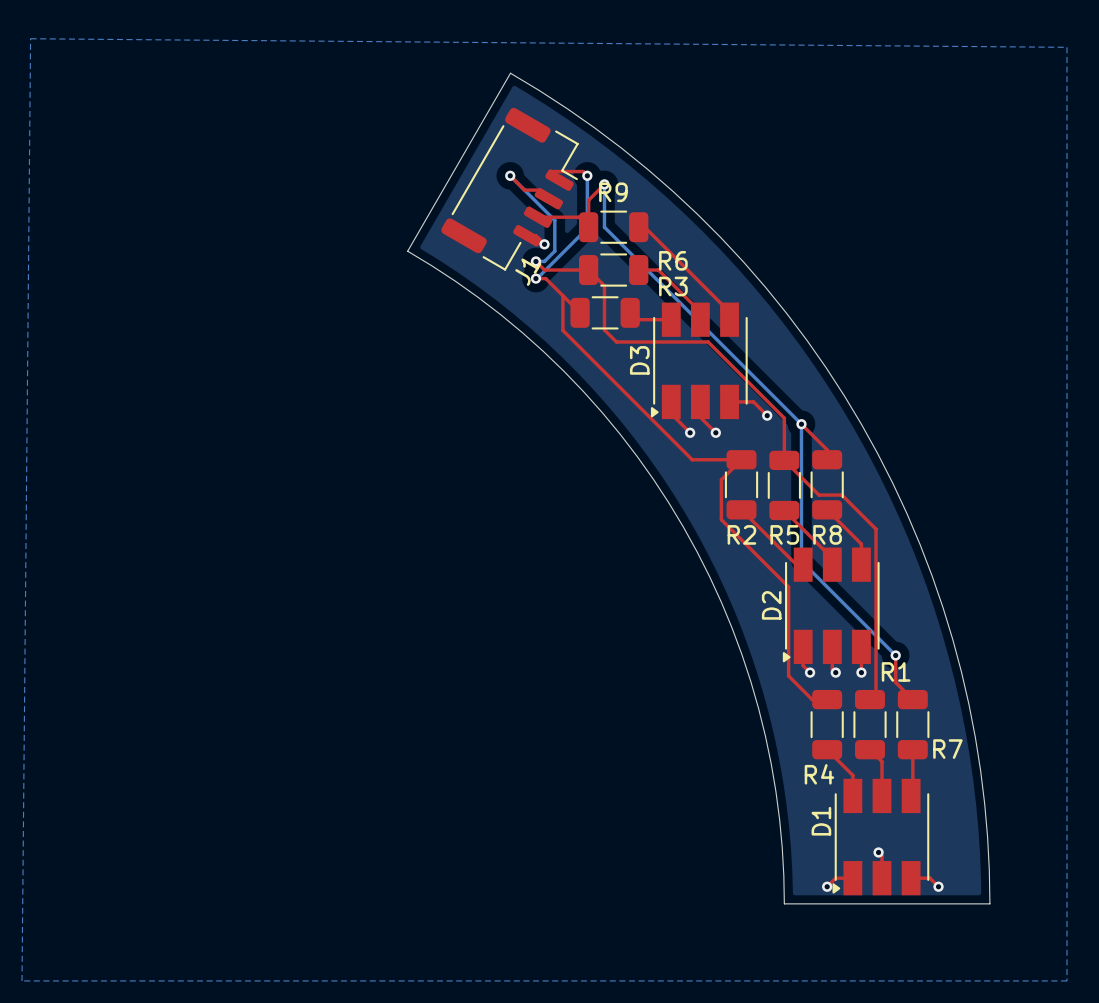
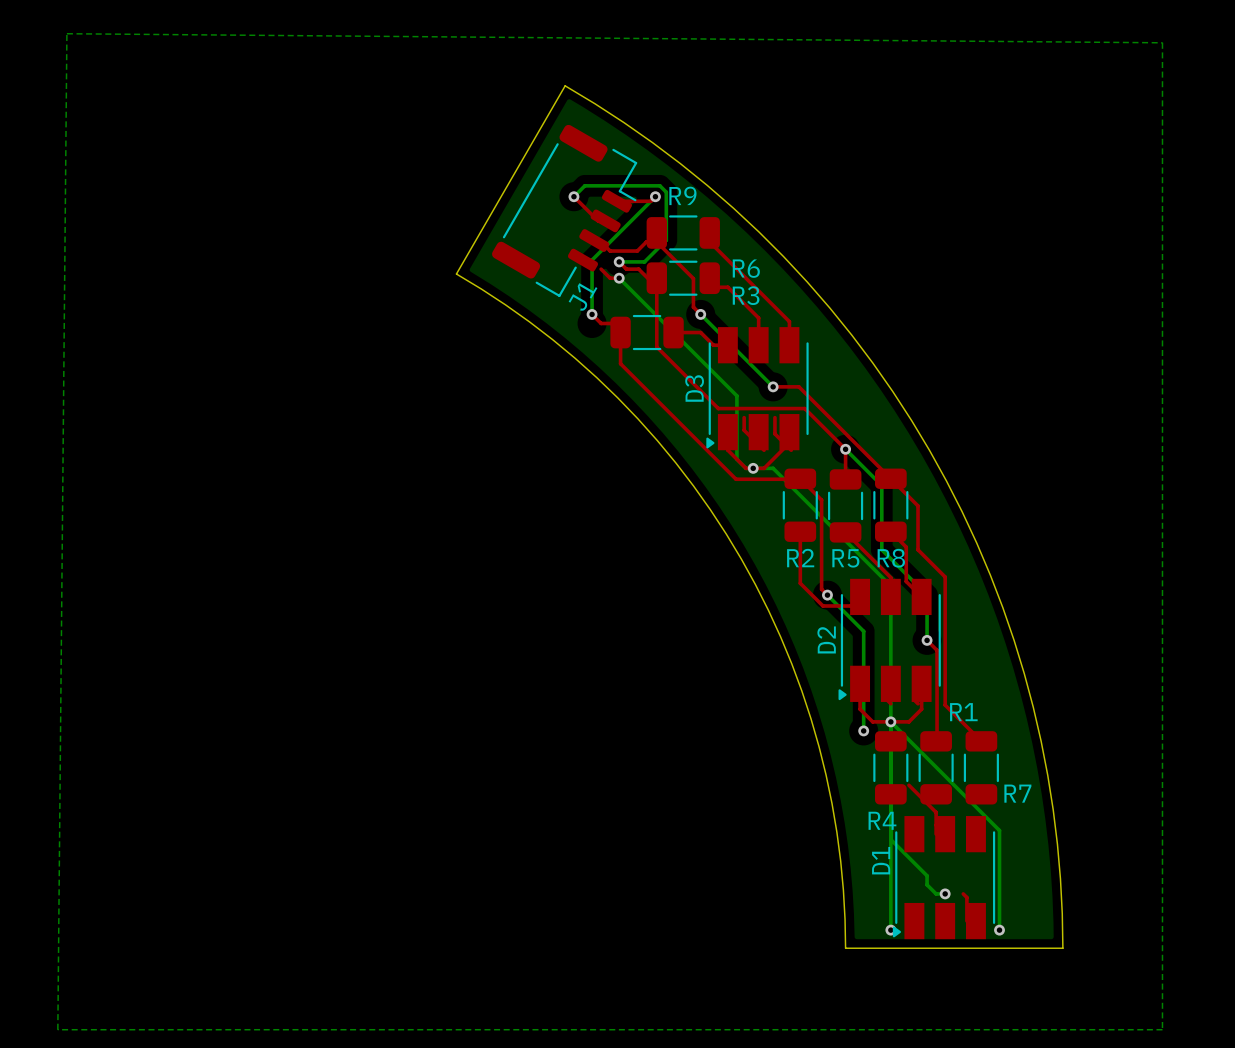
board edge: (501, 88) (510, 73) (539, 90) (621, 148) (697, 213) (743, 262) (786, 313) (826, 367) (861, 424) (892, 483) (920, 544) (942, 607) (961, 671) (980, 770) (989, 870) (989, 903) (972, 903) -> (565, 85) (624, 122) (680, 163) (733, 208) (783, 256) (851, 335) (892, 391) (929, 450) (962, 511) (990, 575) (1014, 640) (1033, 707) (1047, 775) (1057, 844) (1062, 948)
top track: (550, 171) (583, 171) (587, 175) -> none
top track: (510, 175) (524, 190) (540, 190) -> none
bottom track: (510, 175) (554, 220) (554, 251) (544, 261) (535, 261) -> none
via position: (510, 175) -> (573, 196)
bottom track: (587, 175) (587, 228) (535, 278) -> none
via: (587, 175) -> none
top track: (604, 184) (588, 200) (588, 227) (578, 217) (538, 217) -> none
bottom track: (604, 184) (604, 227) (801, 424) (801, 466) -> (845, 449) (881, 485)
via: (604, 184) -> none
J1 position: (510, 189) -> (564, 210)
top track: none -> (573, 196) (598, 220) (605, 220)
bottom track: none -> (573, 196) (584, 185) (659, 185) (666, 192) (666, 240) (644, 261) (619, 261)
top track: none -> (655, 196) (650, 201) (616, 201)
bottom track: none -> (655, 196) (592, 260) (592, 314)
via: none -> (655, 196)
top track: (638, 227) (644, 227) (729, 312) (729, 319) -> none
top track: none -> (709, 241) (789, 321) (789, 345)
top track: none -> (610, 251) (637, 251) (646, 241) (656, 241) (693, 278) (693, 307) (700, 314)
via: (544, 244) -> none
board edge: (407, 251) (455, 281) (500, 314) (563, 371) (602, 412) (637, 456) (683, 527) (709, 576) (732, 628) (758, 708) (771, 763) (779, 819) (784, 903) -> (465, 258) (456, 274) (505, 304) (552, 339) (596, 377) (637, 418) (693, 485) (741, 559) (780, 636) (811, 718) (826, 775) (836, 832) (843, 890) (845, 948) (863, 948)
top track: none -> (619, 261) (626, 269) (638, 269) (656, 287) (656, 347) (718, 408) (804, 408) (845, 449) (845, 479)
via: none -> (619, 261)
via: (535, 261) -> none
top track: (553, 270) (588, 270) (604, 285) (604, 329) (616, 341) (708, 341) (784, 418) (784, 460) (819, 495) (841, 495) (876, 529) (876, 693) (870, 699) -> none
bottom track: none -> (619, 278) (736, 395) (736, 459) (745, 468) (773, 468) (890, 586) (890, 930)
via: none -> (619, 278)
top track: (638, 270) (658, 270) (700, 312) (700, 319) -> none
top track: (535, 278) (545, 278) (580, 312) -> none
via: (535, 278) -> none
top track: none -> (709, 287) (727, 287) (758, 318) (758, 345)
top track: (562, 295) (562, 330) (692, 459) (741, 459) (721, 479) (721, 519) (788, 586) (788, 676) (812, 699) (827, 699) -> none
top track: none -> (592, 314) (601, 323) (611, 323) (620, 332) (620, 363) (736, 479) (800, 478) (821, 500) (821, 589) (827, 595)
via: none -> (592, 314)
bottom track: none -> (700, 314) (773, 386)
via: none -> (700, 314)
R3 position: (605, 312) -> (647, 332)
top track: (637, 319) (671, 319) -> none
top track: none -> (673, 332) (700, 332) (713, 345) (727, 345)
D3 position: (699, 360) -> (757, 388)
via: none -> (773, 386)
top track: (729, 401) (753, 401) (767, 415) -> none
top track: none -> (727, 432) (727, 450) (745, 468) (764, 468) (789, 443) (789, 432)
via position: (767, 415) -> (845, 449)
top track: (801, 424) (827, 449) (827, 459) -> none
via: (801, 424) -> none
via: (690, 432) -> none
via: (715, 432) -> none
via: none -> (753, 468)
R2 position: (741, 484) -> (800, 505)
R8 position: (827, 484) -> (890, 505)
R5 position: (784, 485) -> (845, 505)
top track: none -> (800, 531) (800, 583) (822, 605) (850, 605) (860, 596)
top track: (741, 509) (796, 564) (803, 564) -> none
top track: none -> (890, 531) (906, 547) (906, 581) (921, 596)
top track: (827, 509) (861, 544) (861, 552) -> (773, 386) (798, 386) (918, 505) (918, 549) (945, 577)
top track: none -> (845, 532) (890, 577) (890, 596)
top track: (784, 510) (832, 558) (832, 564) -> none
bottom track: (801, 526) (801, 561) (895, 655) -> (881, 549) (927, 595) (927, 640)
top track: none -> (945, 589) (945, 676)
bottom track: none -> (827, 595) (863, 631) (863, 730)
via: none -> (827, 595)
D2 position: (831, 605) -> (889, 640)
top track: none -> (927, 640) (937, 650) (936, 741)
via: none -> (927, 640)
top track: none -> (921, 683) (921, 709) (908, 721) (872, 721) (860, 709) (860, 683) (863, 687)
top track: (895, 655) (895, 682) (912, 699) -> none
via: (895, 655) -> none
via: (810, 672) -> none
via: (835, 672) -> none
top track: none -> (945, 703) (981, 741)
via: (861, 672) -> none
bottom track: none -> (890, 721) (999, 830) (999, 930)
via: none -> (890, 721)
via: none -> (863, 730)
R1 position: (827, 724) -> (890, 767)
R4 position: (870, 724) -> (936, 767)
R7 position: (912, 724) -> (981, 767)
top track: (870, 749) (881, 761) (881, 795) -> none
top track: (912, 749) (912, 794) (911, 795) -> none
bottom track: none -> (890, 839) (927, 875) (927, 884) (936, 893) (945, 893)
D1 position: (880, 837) -> (944, 877)
via position: (878, 852) -> (945, 893)
top track: (852, 878) (835, 878) (827, 886) -> none
top track: (911, 878) (929, 878) (938, 886) -> none
via position: (827, 886) -> (890, 930)
via: none -> (999, 930)
via: (938, 886) -> none

